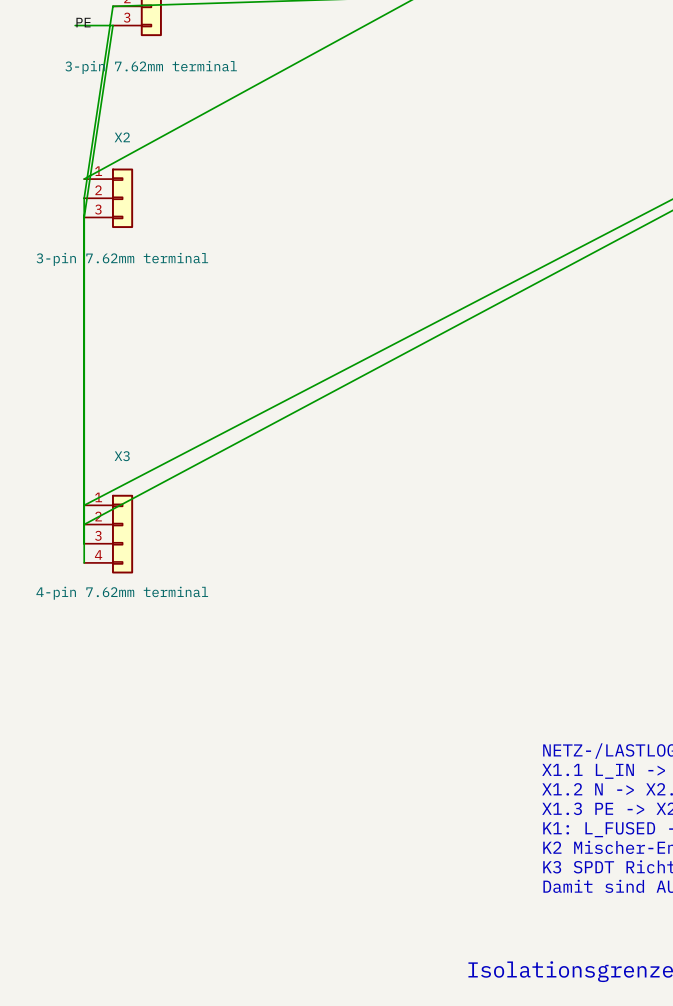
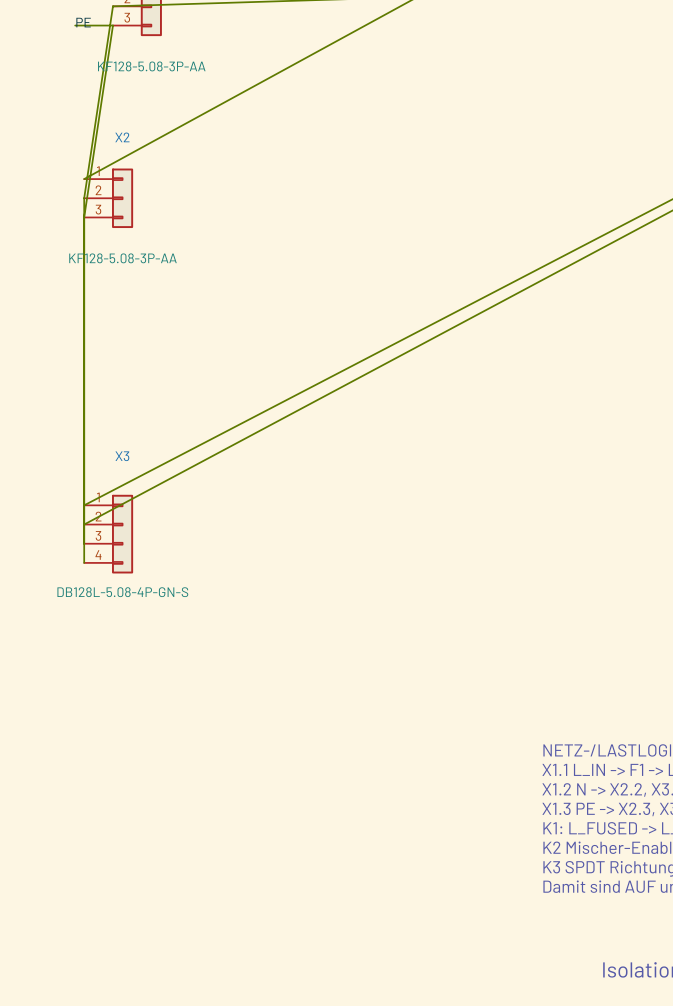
part value: 3-pin 7.62mm terminal (151, 67) -> KF128-5.08-3P-AA (151, 66)
X2 value: 3-pin 7.62mm terminal (122, 259) -> KF128-5.08-3P-AA (122, 258)
X3 value: 4-pin 7.62mm terminal (122, 593) -> DB128L-5.08-4P-GN-S (122, 592)

